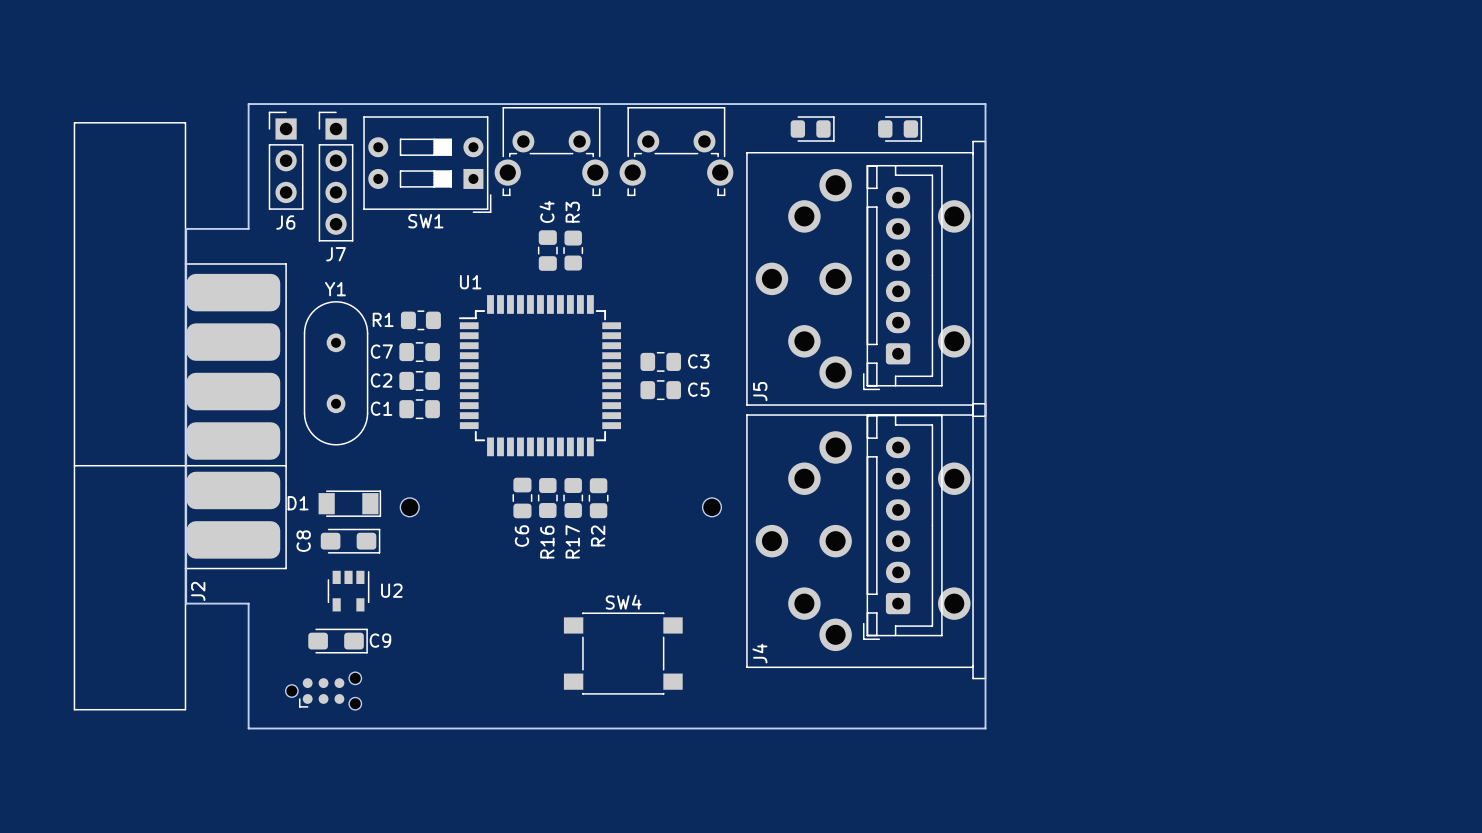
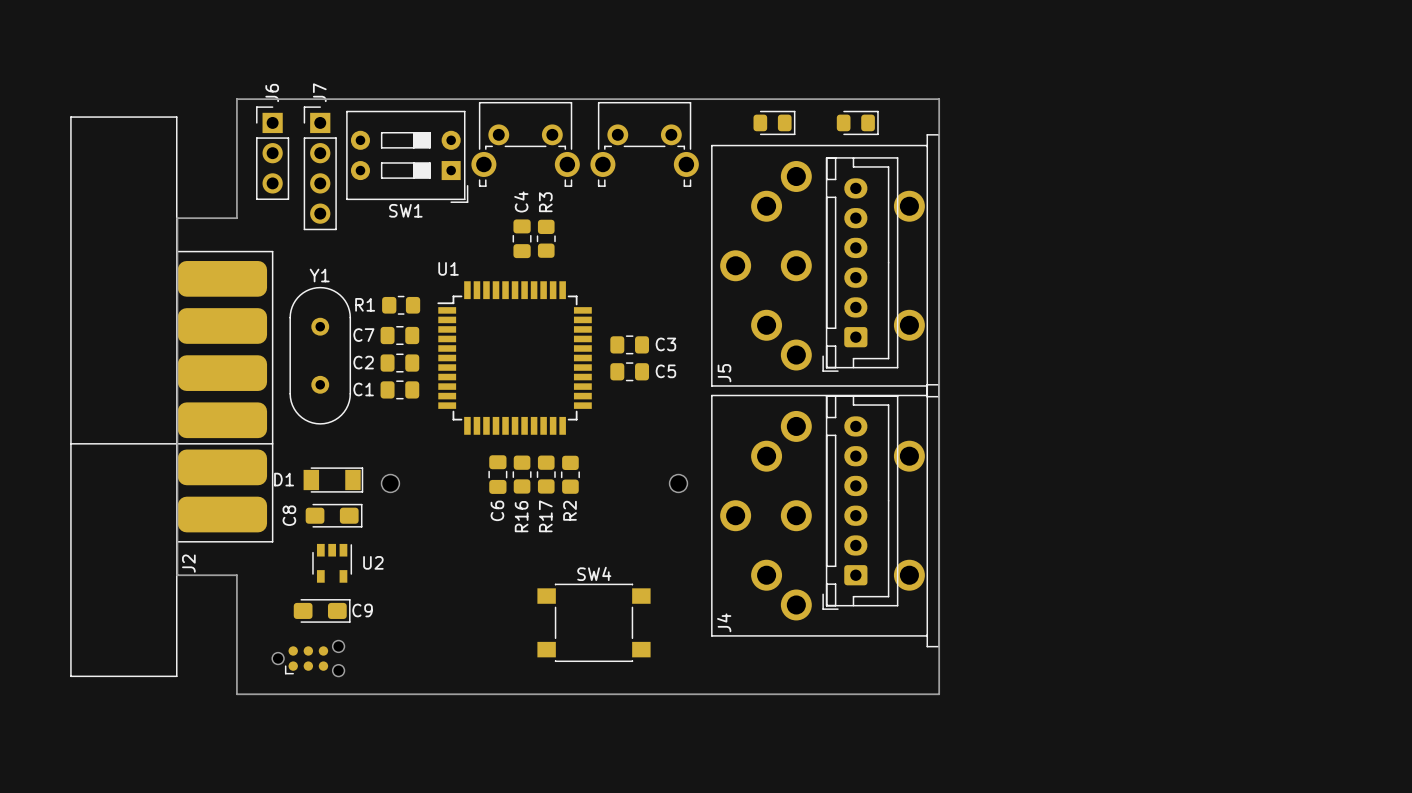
J6 name rotation: 0° (285, 222) -> 90° counterclockwise (272, 92)
J6 name position: J6 (285, 222) -> J6 (272, 92)
J7 name rotation: 0° (336, 254) -> 90° counterclockwise (319, 92)
J7 name position: J7 (336, 254) -> J7 (319, 92)

